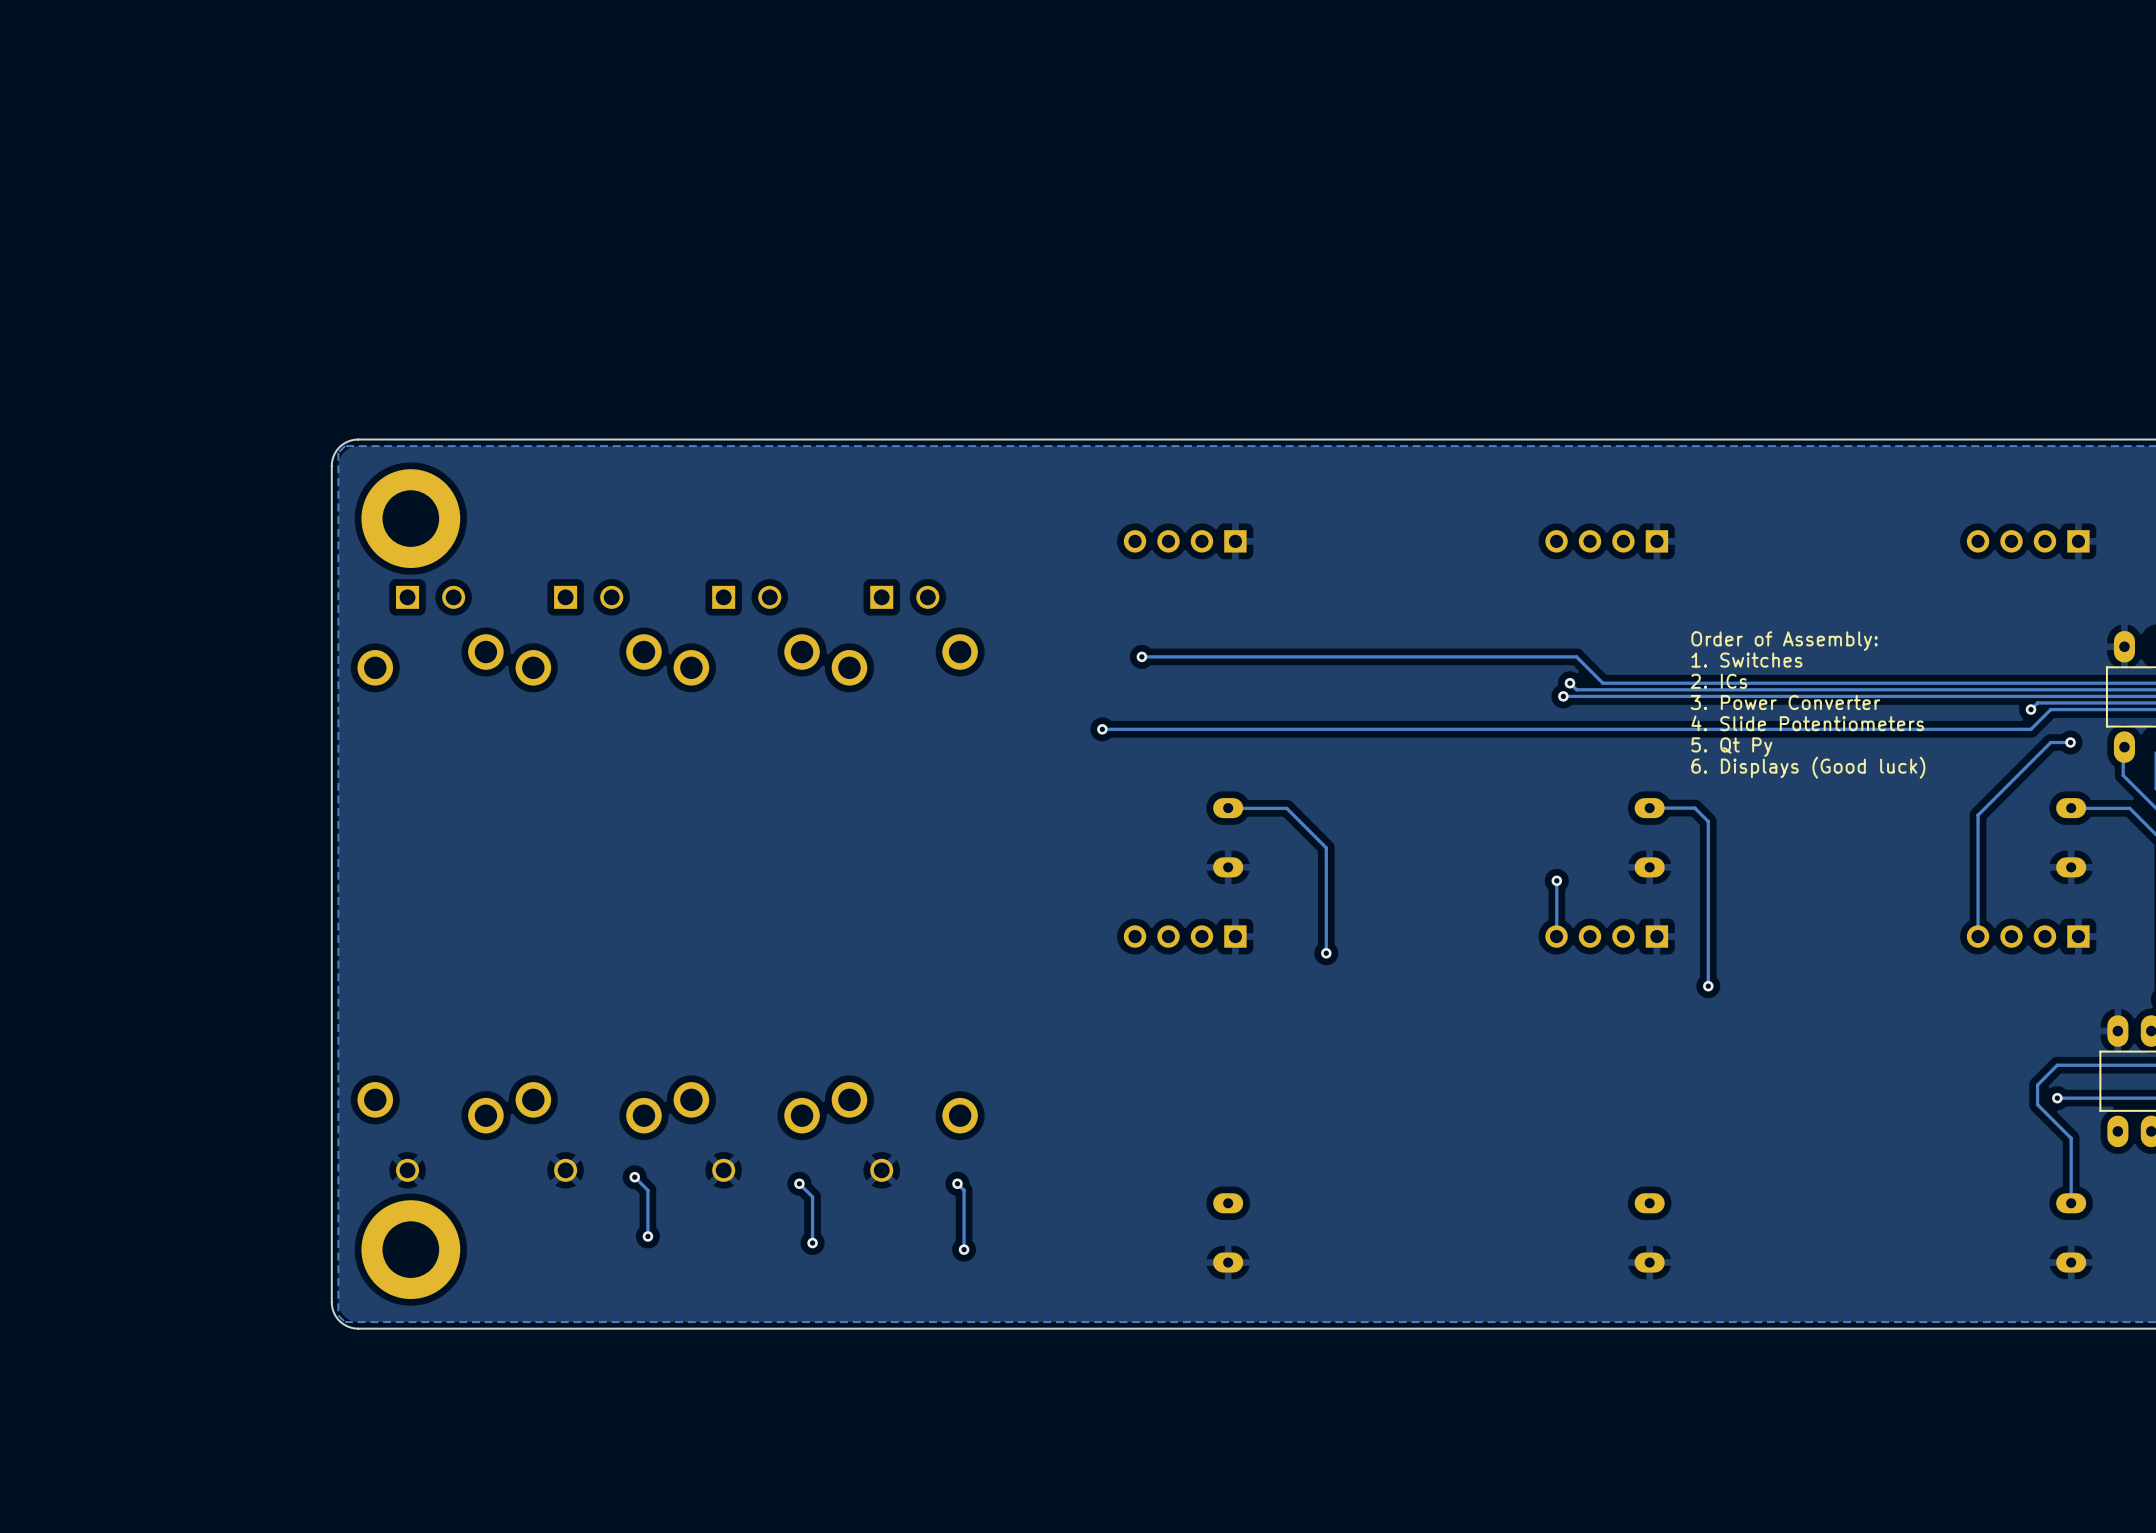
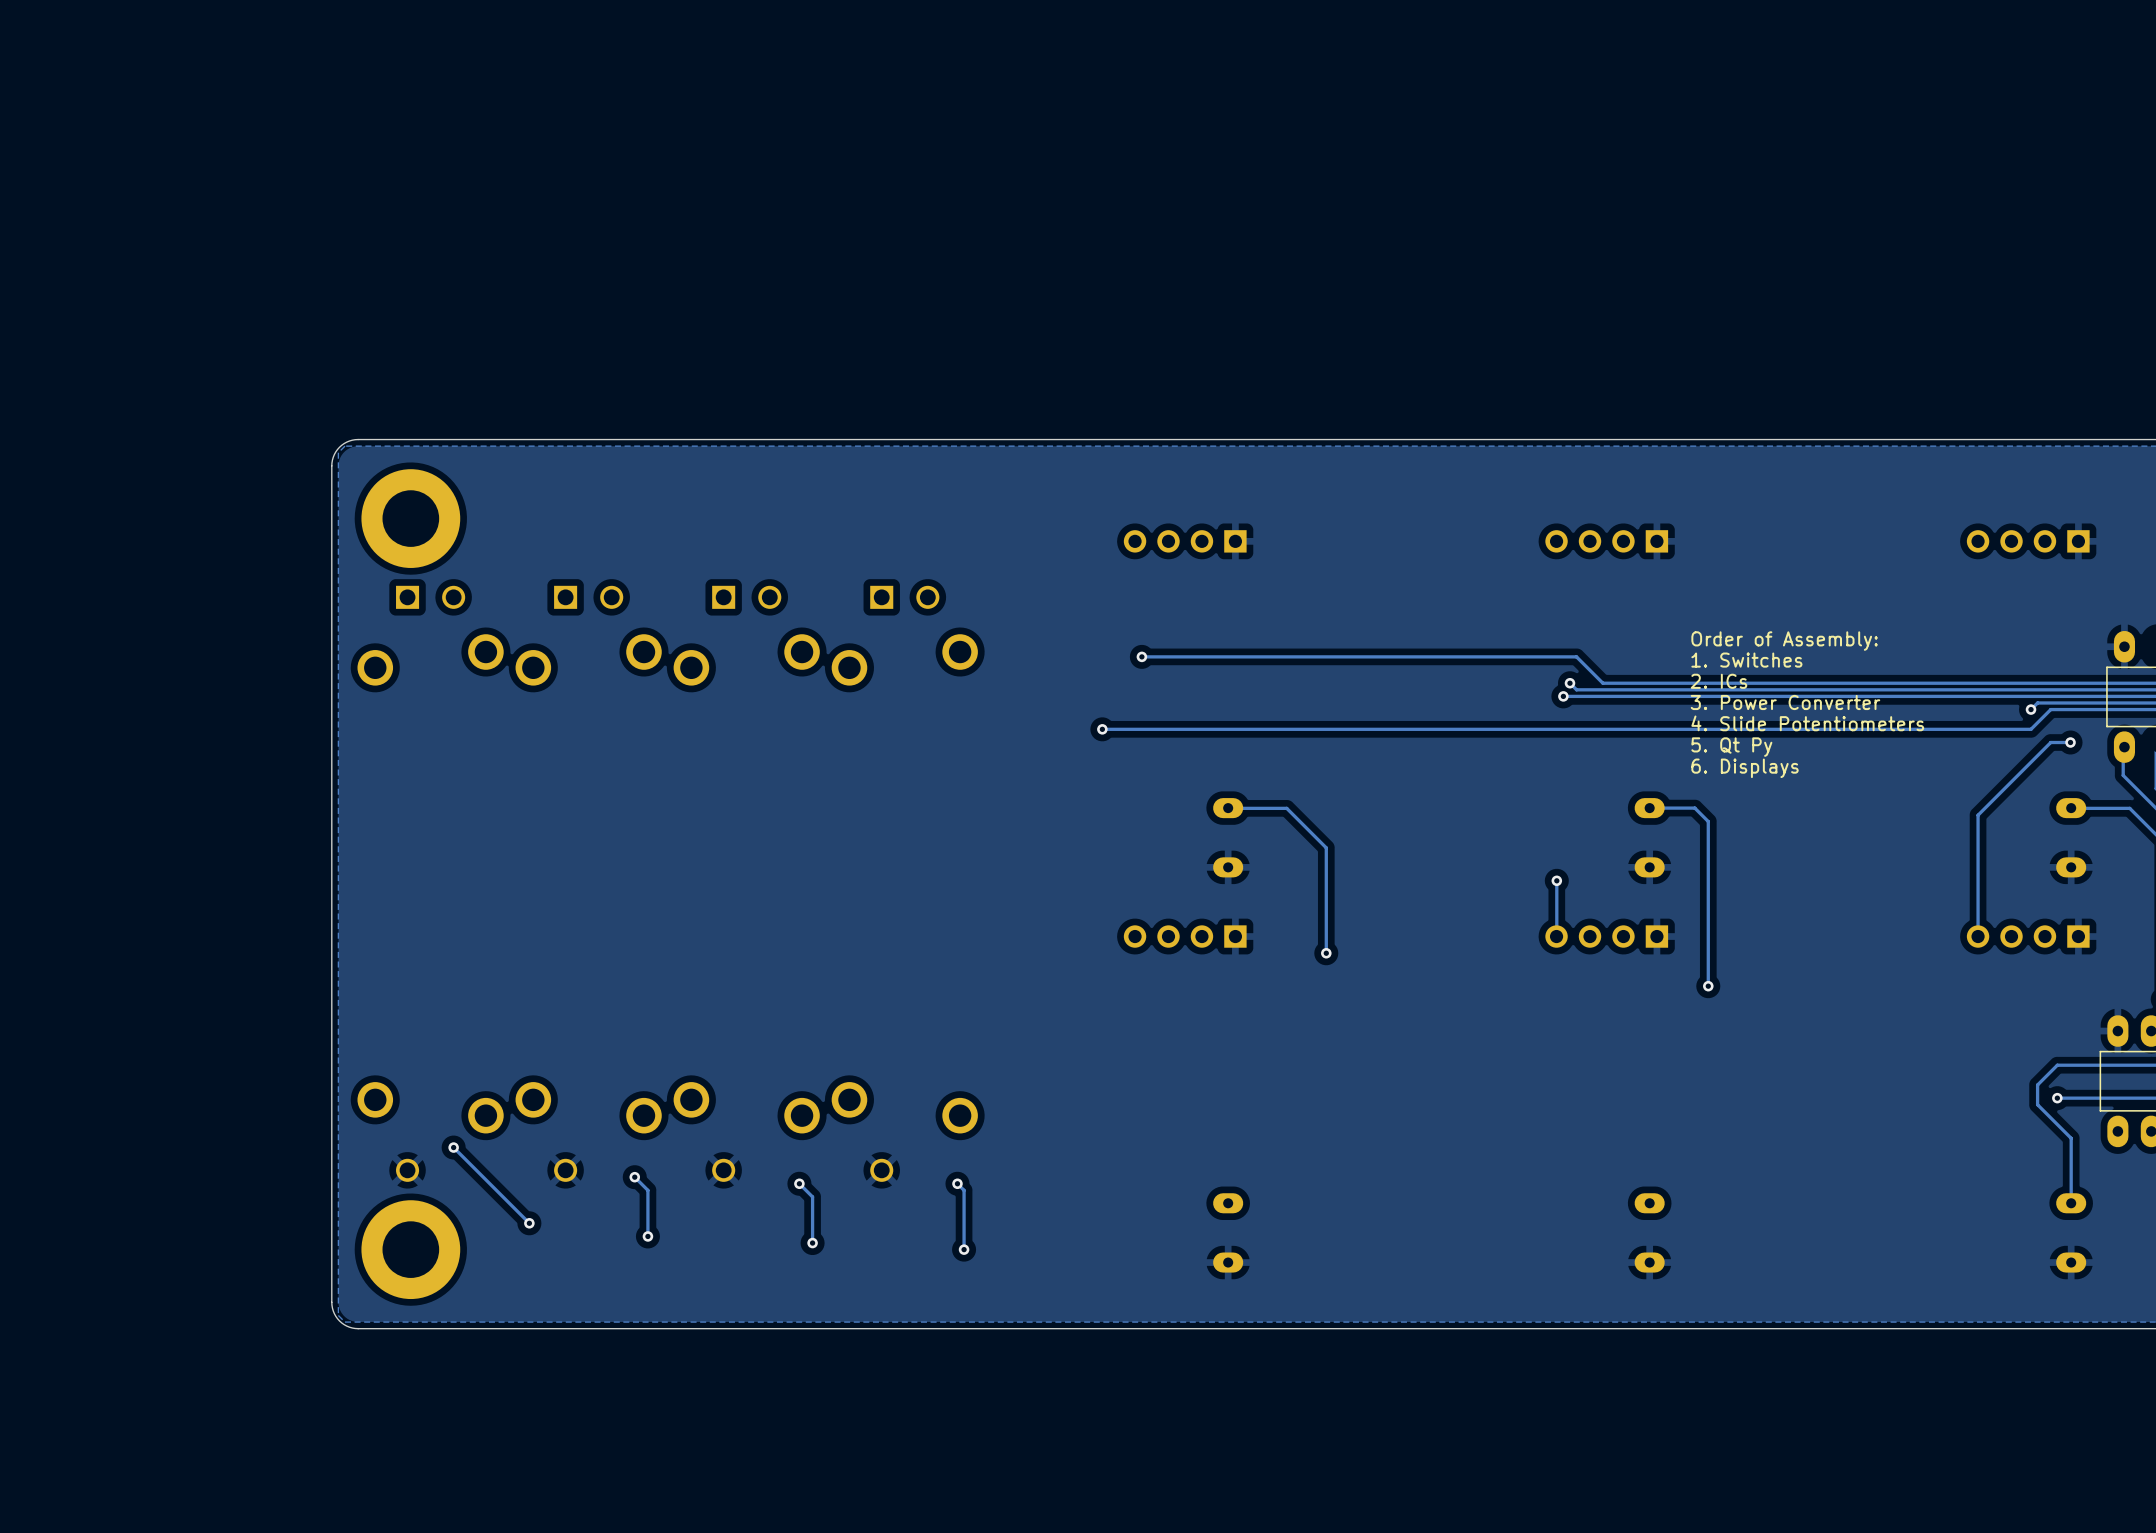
text: 6. Displays (Good luck) (1808, 767) -> 6. Displays (1745, 768)
track: none -> (453, 1147) (529, 1223)
via: none -> (453, 1147)
via: none -> (529, 1223)

